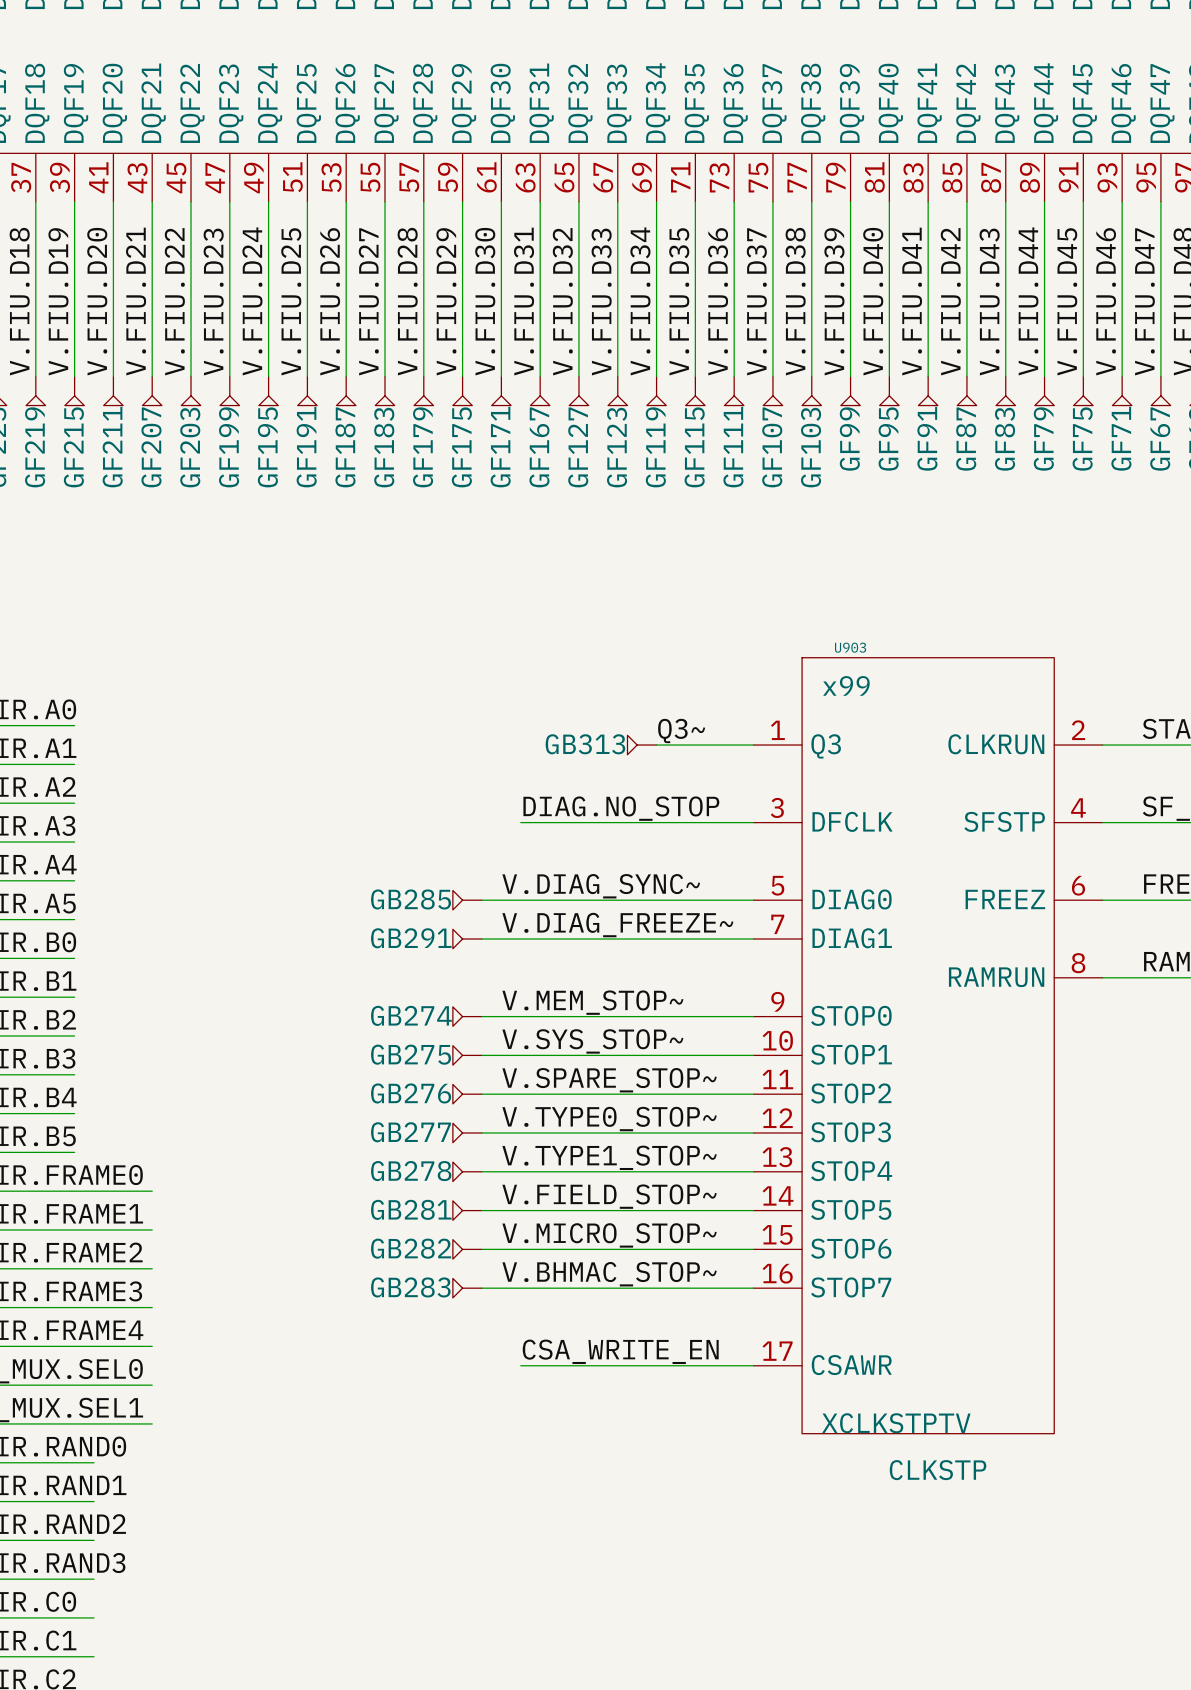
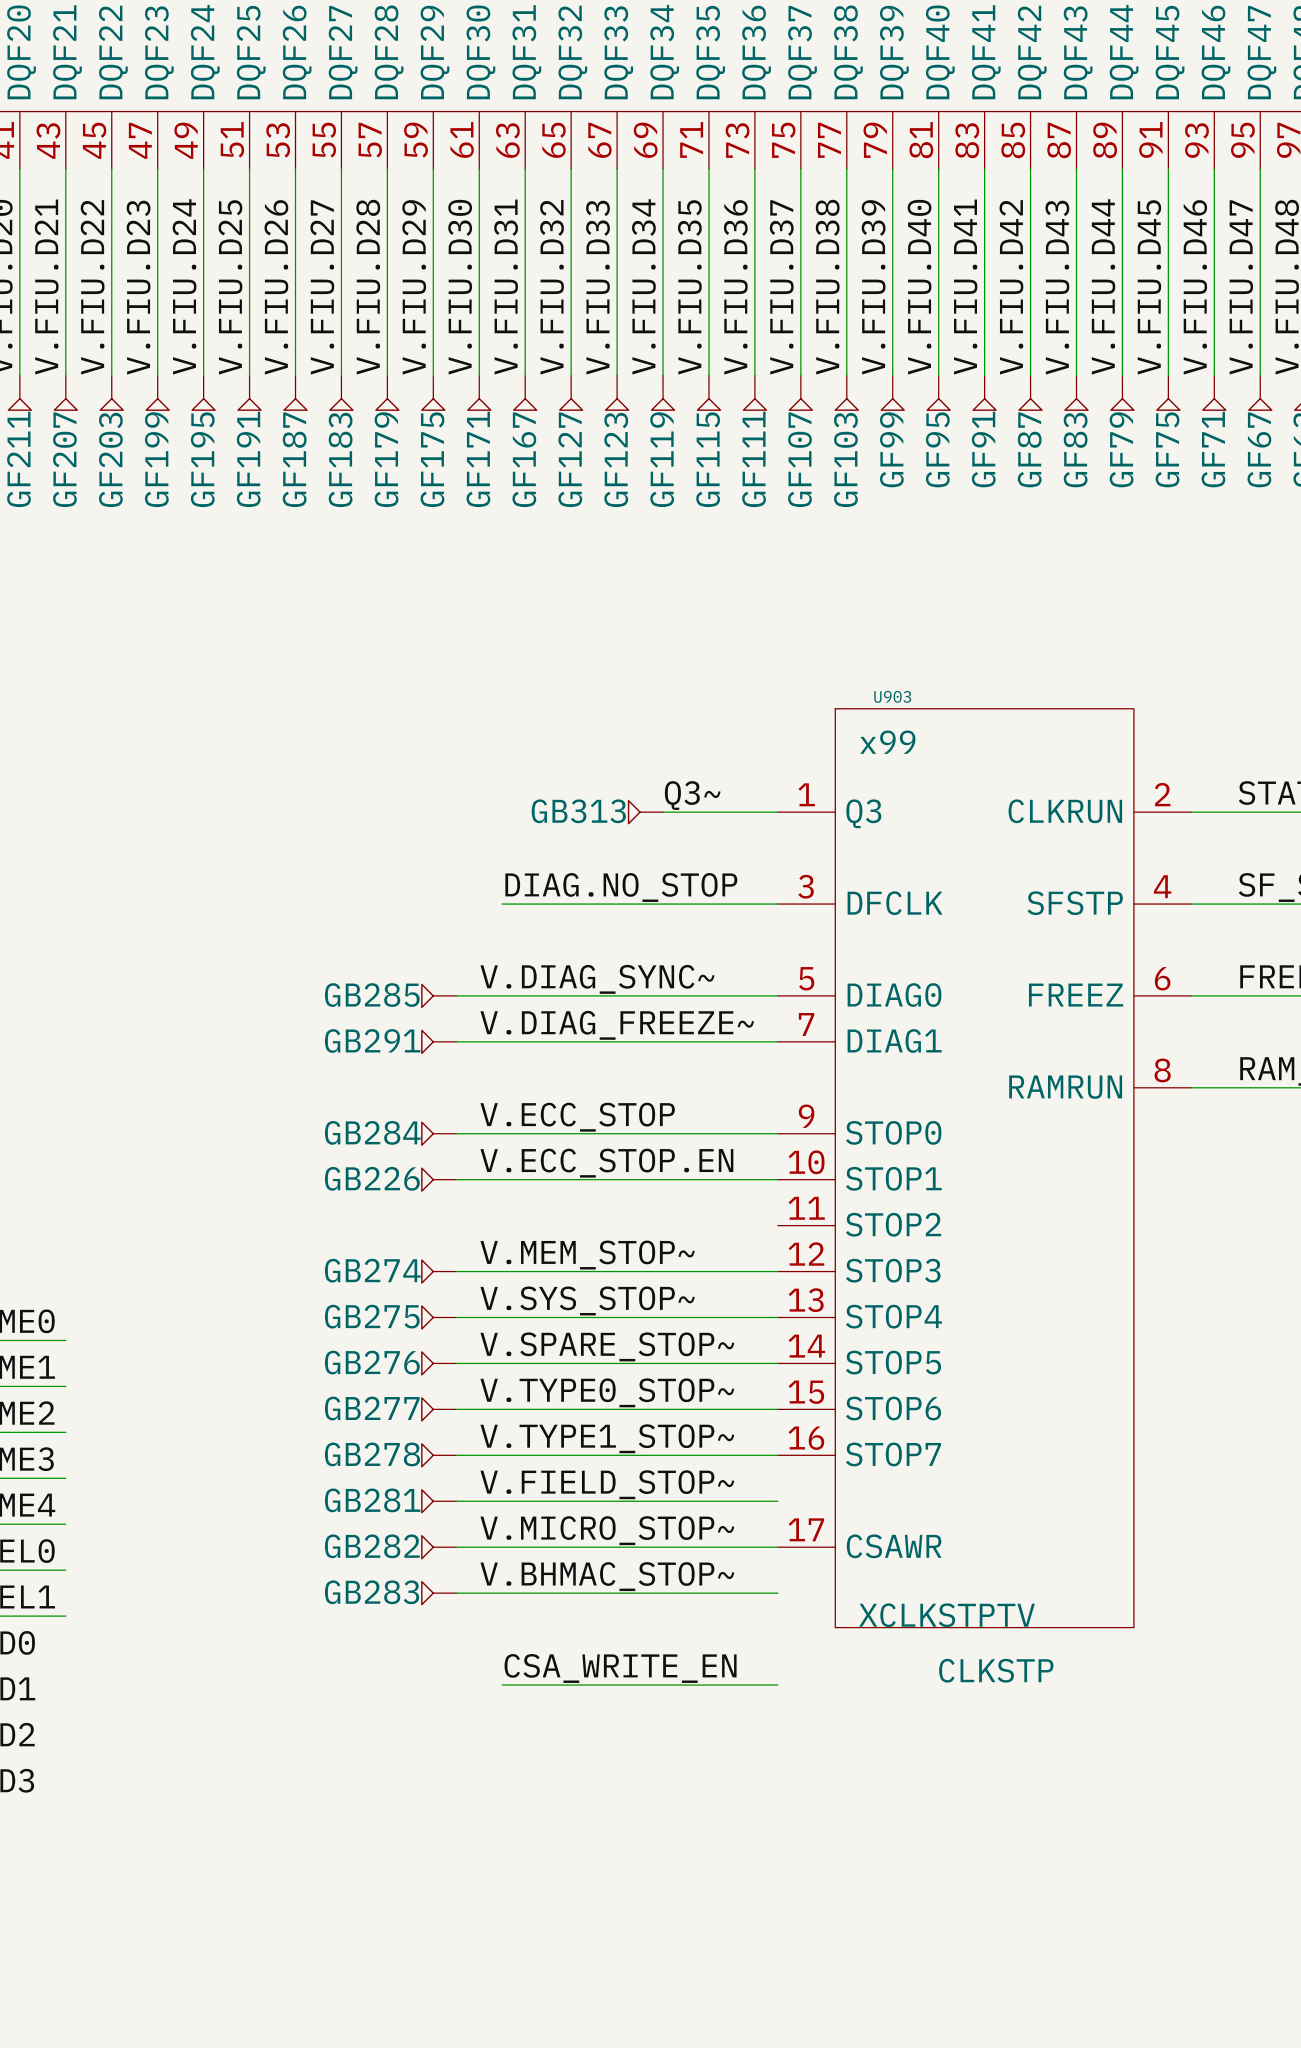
label: V.MEM_STOP~ (592, 1002) -> V.ECC_STOP (577, 1117)
GB274 name: GB274 (411, 1015) -> GB284 (372, 1132)
label: V.SYS_STOP~ (592, 1041) -> V.ECC_STOP.EN (606, 1163)
GB275 name: GB275 (411, 1054) -> GB226 (372, 1178)
label: V.SPARE_STOP~ (609, 1080) -> none
GB276: (467, 1094) -> none
wire: (481, 1094) (753, 1094) -> none
label: V.TYPE0_STOP~ (609, 1119) -> V.MEM_STOP~ (587, 1255)
GB277 name: GB277 (411, 1132) -> GB274 (372, 1270)
label: V.TYPE1_STOP~ (609, 1157) -> V.SYS_STOP~ (587, 1300)
GB278 name: GB278 (411, 1171) -> GB275 (372, 1316)
label: V.FIELD_STOP~ (609, 1196) -> V.SPARE_STOP~ (607, 1346)
GB281 name: GB281 (411, 1209) -> GB276 (372, 1362)
label: V.MICRO_STOP~ (609, 1235) -> V.TYPE0_STOP~ (607, 1392)
GB282 name: GB282 (411, 1248) -> GB277 (372, 1408)
label: V.BHMAC_STOP~ (609, 1274) -> V.TYPE1_STOP~ (607, 1438)
GB283 name: GB283 (410, 1287) -> GB278 (372, 1454)
label: none -> V.FIELD_STOP~ (607, 1484)
GB281: none -> (438, 1501)
wire: none -> (456, 1501) (777, 1501)
label: none -> V.MICRO_STOP~ (607, 1530)
label position: CSA_WRITE_EN (620, 1351) -> CSA_WRITE_EN (620, 1668)
GB282: none -> (438, 1547)
wire: none -> (456, 1547) (502, 1547)
label: none -> V.BHMAC_STOP~ (607, 1576)
GB283: none -> (438, 1593)
wire: none -> (456, 1593) (777, 1593)
wire: none -> (502, 1685) (777, 1685)

